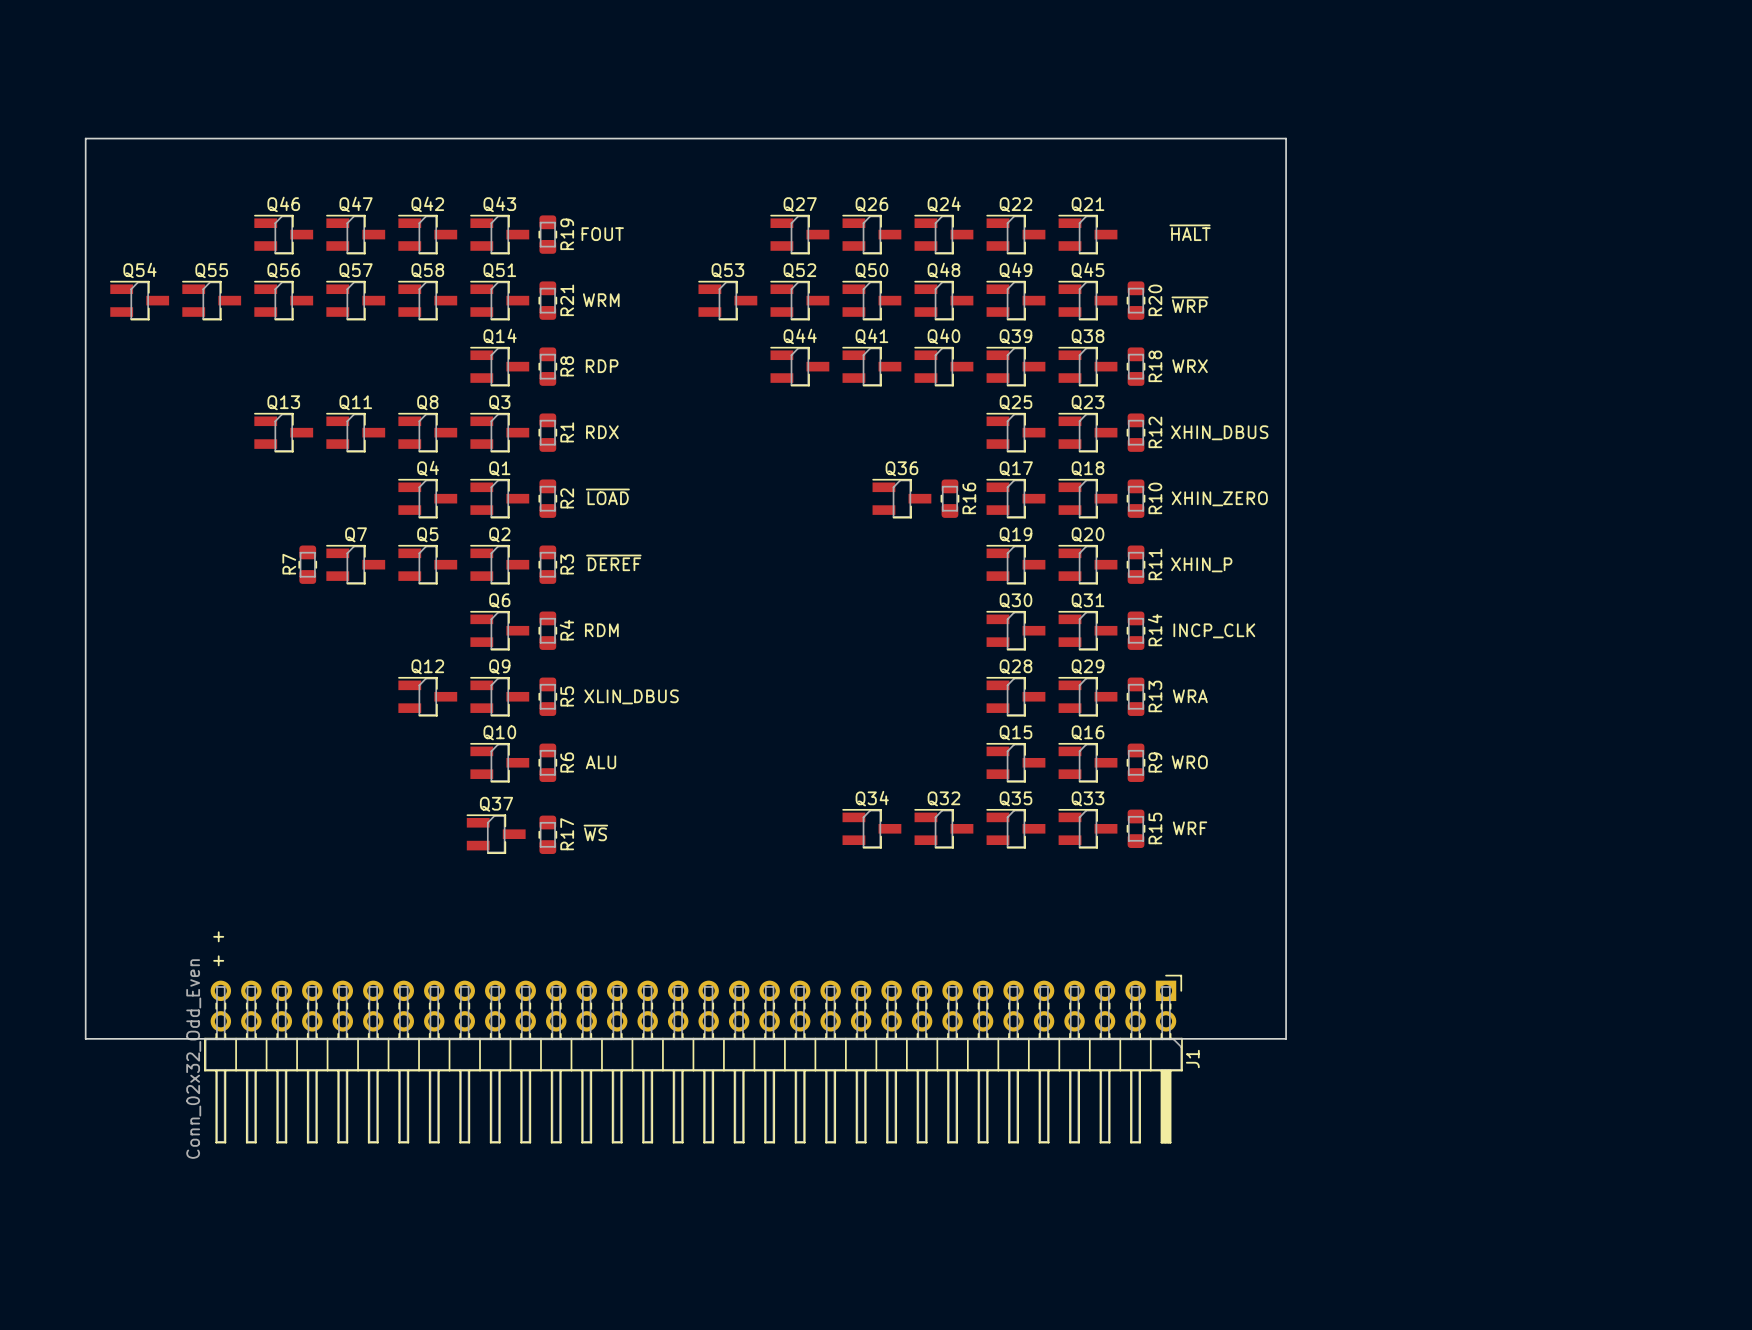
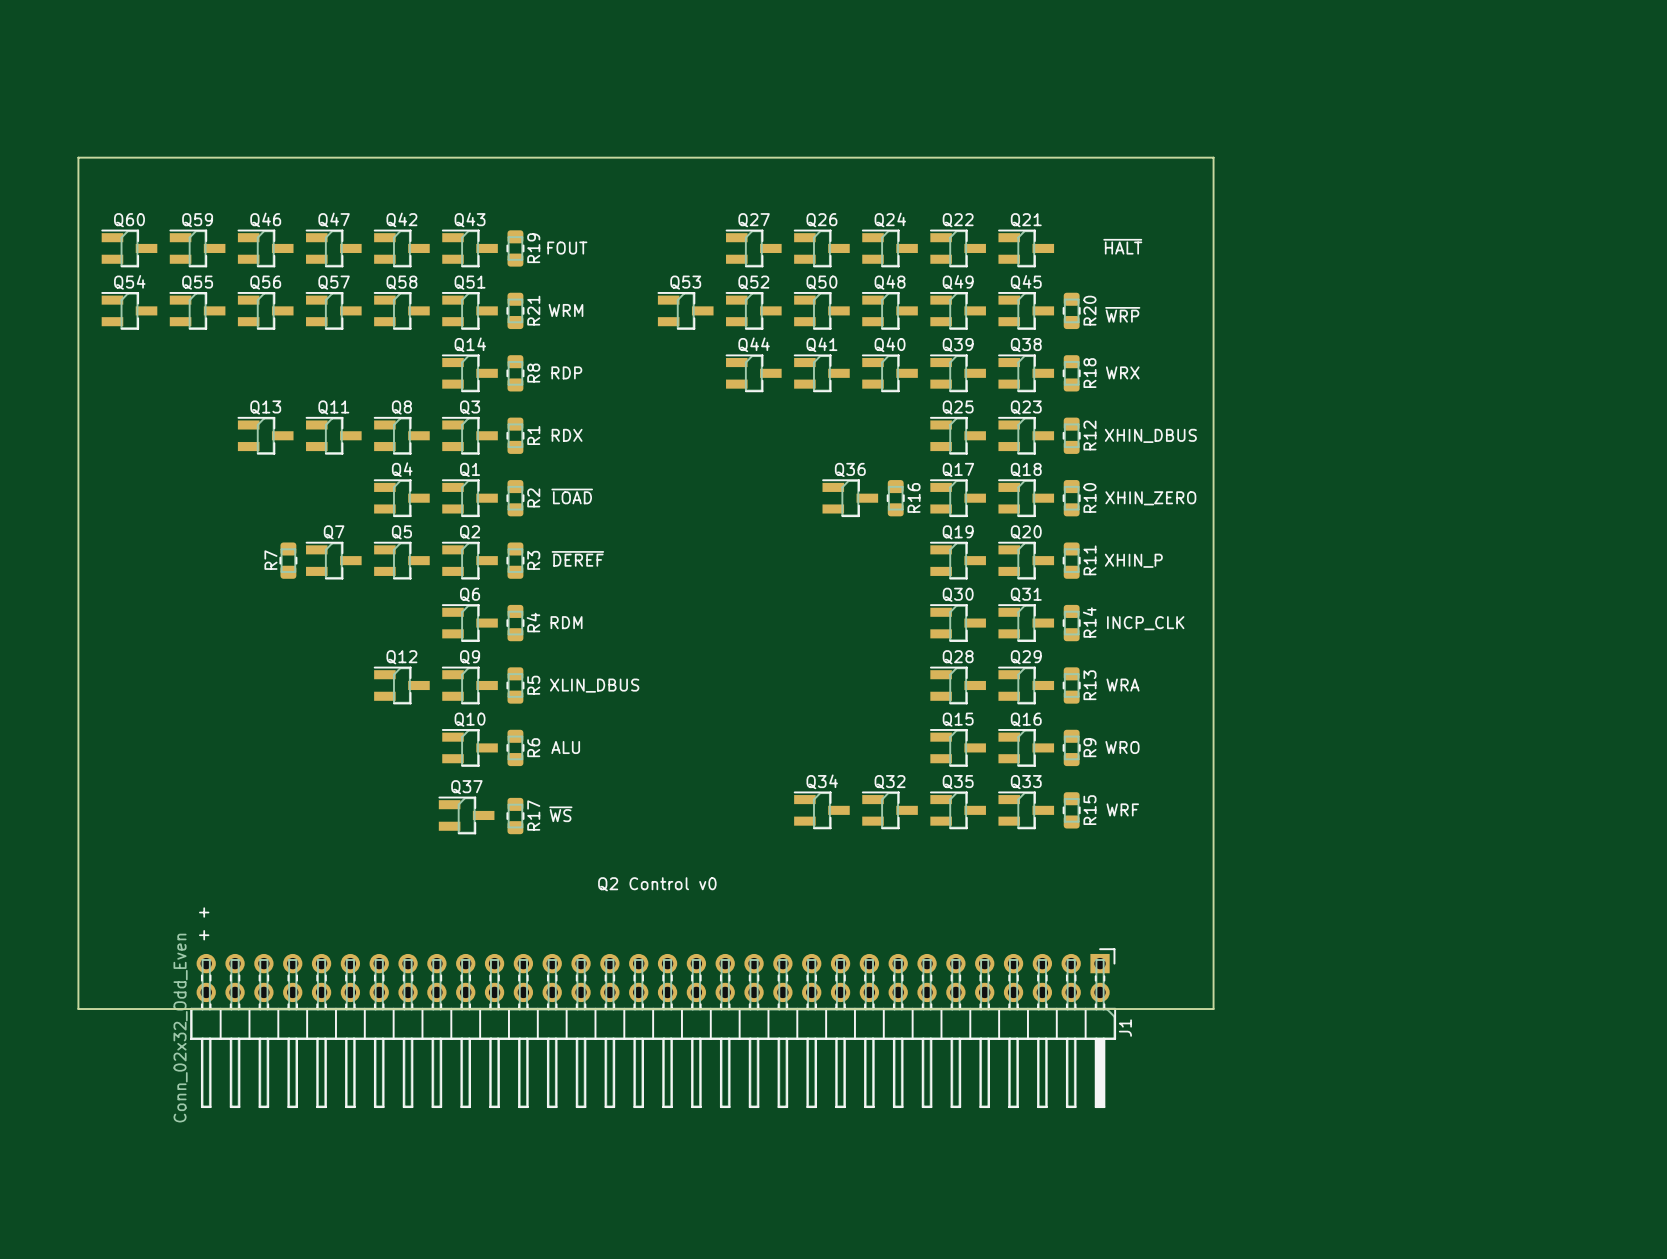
Q60: none -> (129, 248)
Q59: none -> (197, 248)
text: none -> Q2 Control v0 (657, 884)

